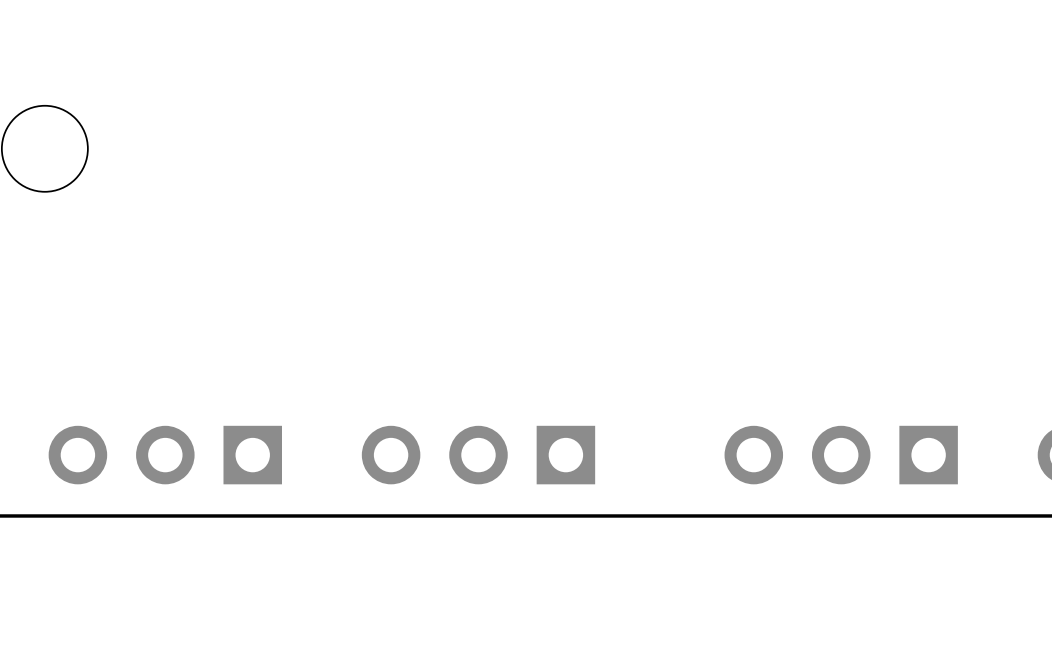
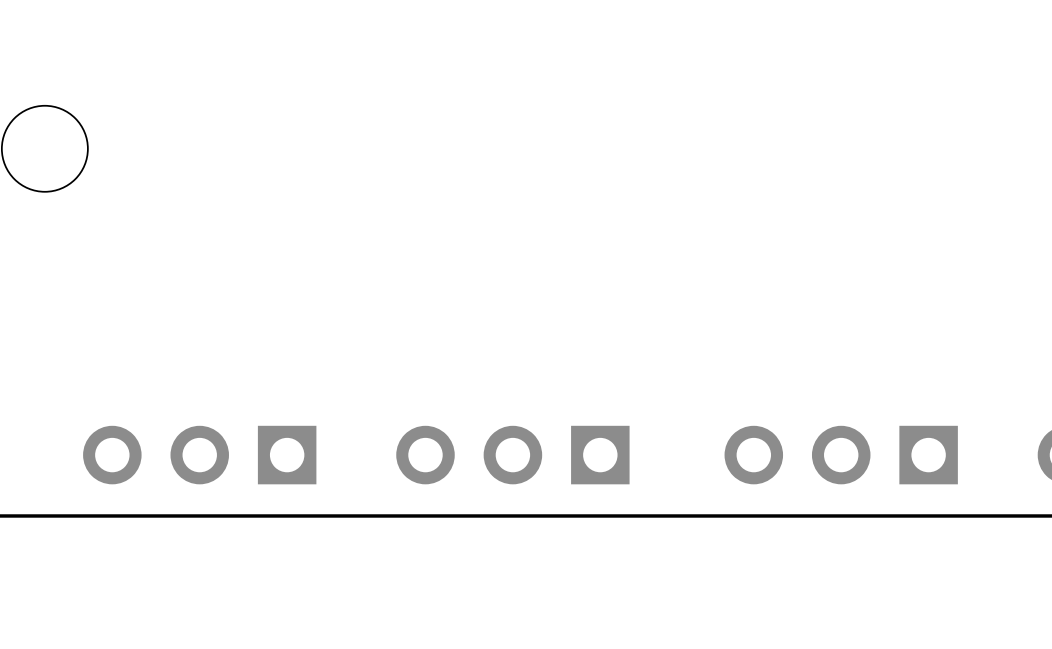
part position: (165, 455) -> (199, 455)
part position: (478, 455) -> (512, 455)

